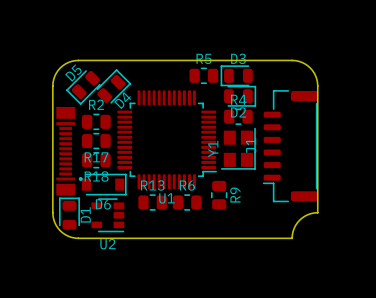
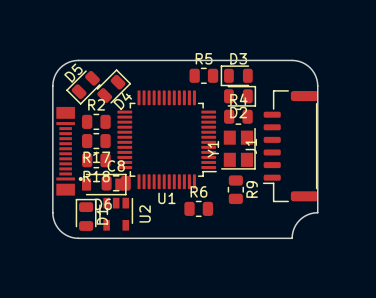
C8: none -> (116, 183)
R9 position: (219, 195) -> (235, 189)
R13: (152, 202) -> none
R6 position: (187, 202) -> (198, 208)
D1 position: (69, 213) -> (86, 214)
U2 rotation: 0° (107, 215) -> 90° counterclockwise (116, 214)

